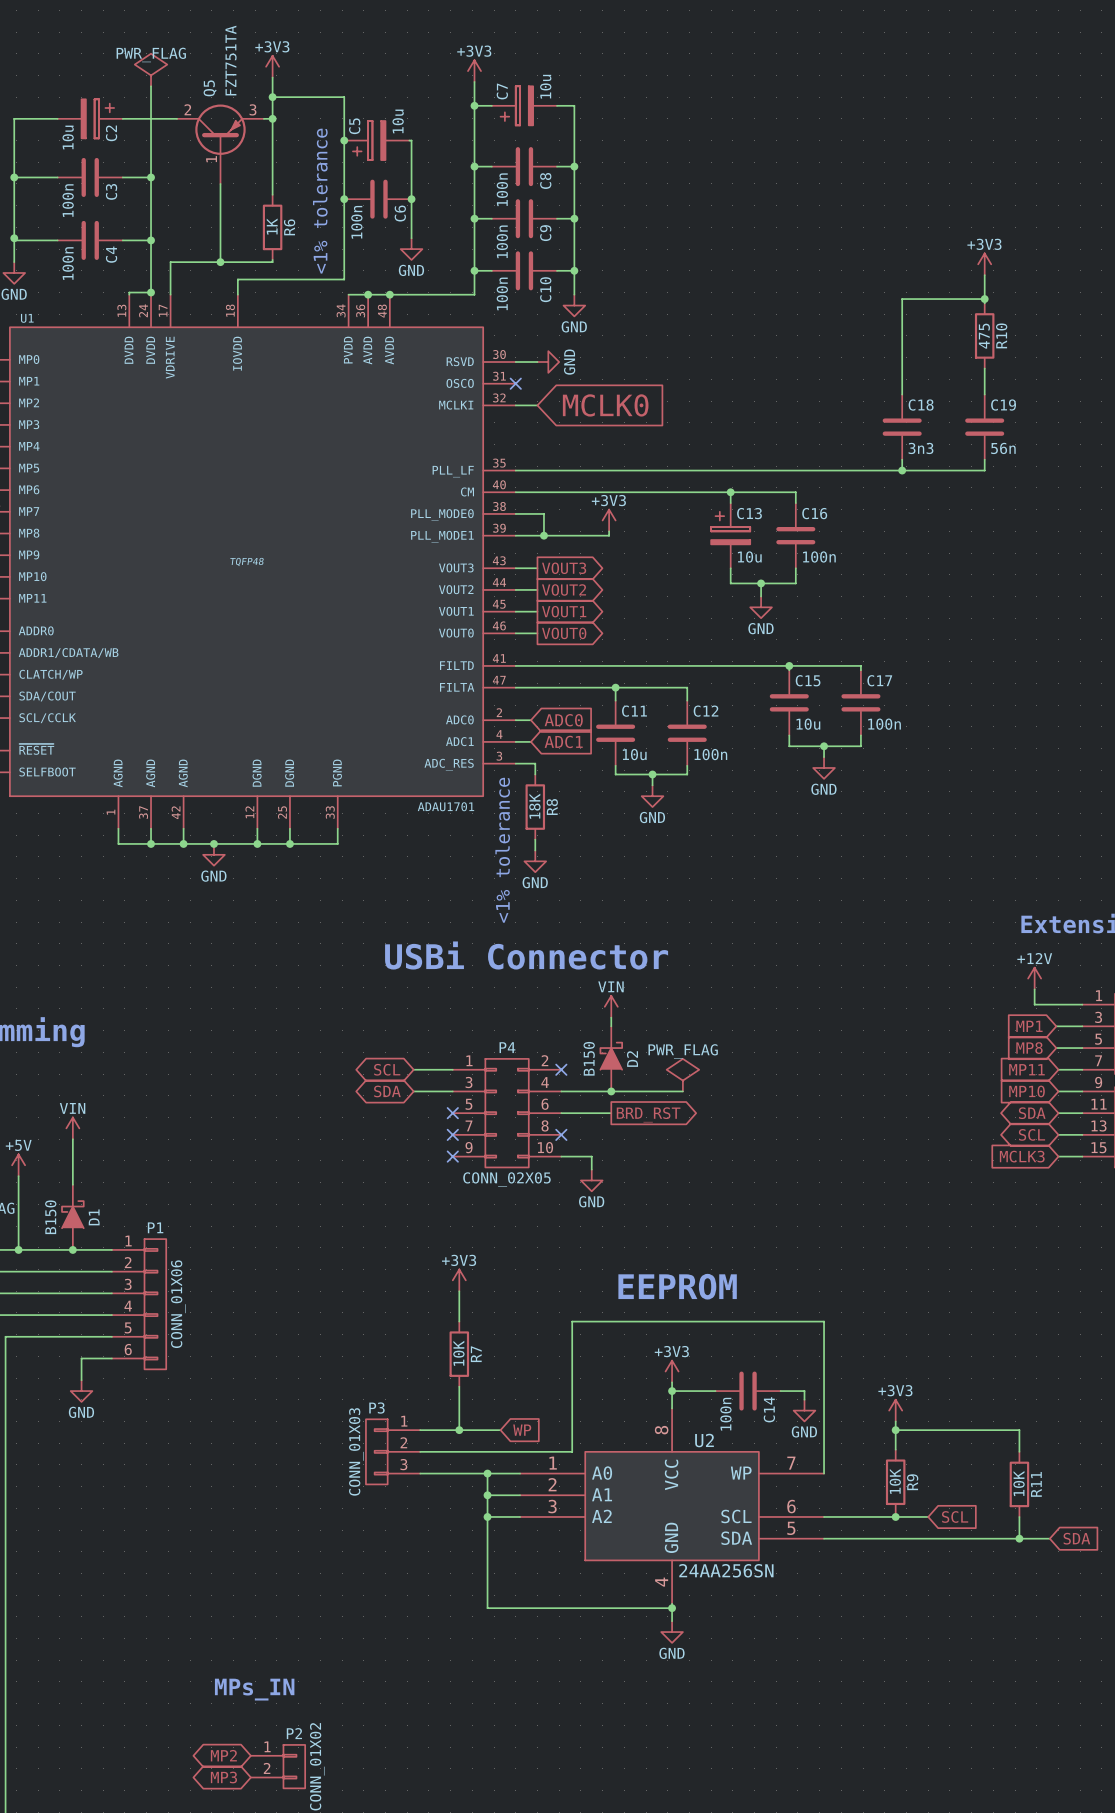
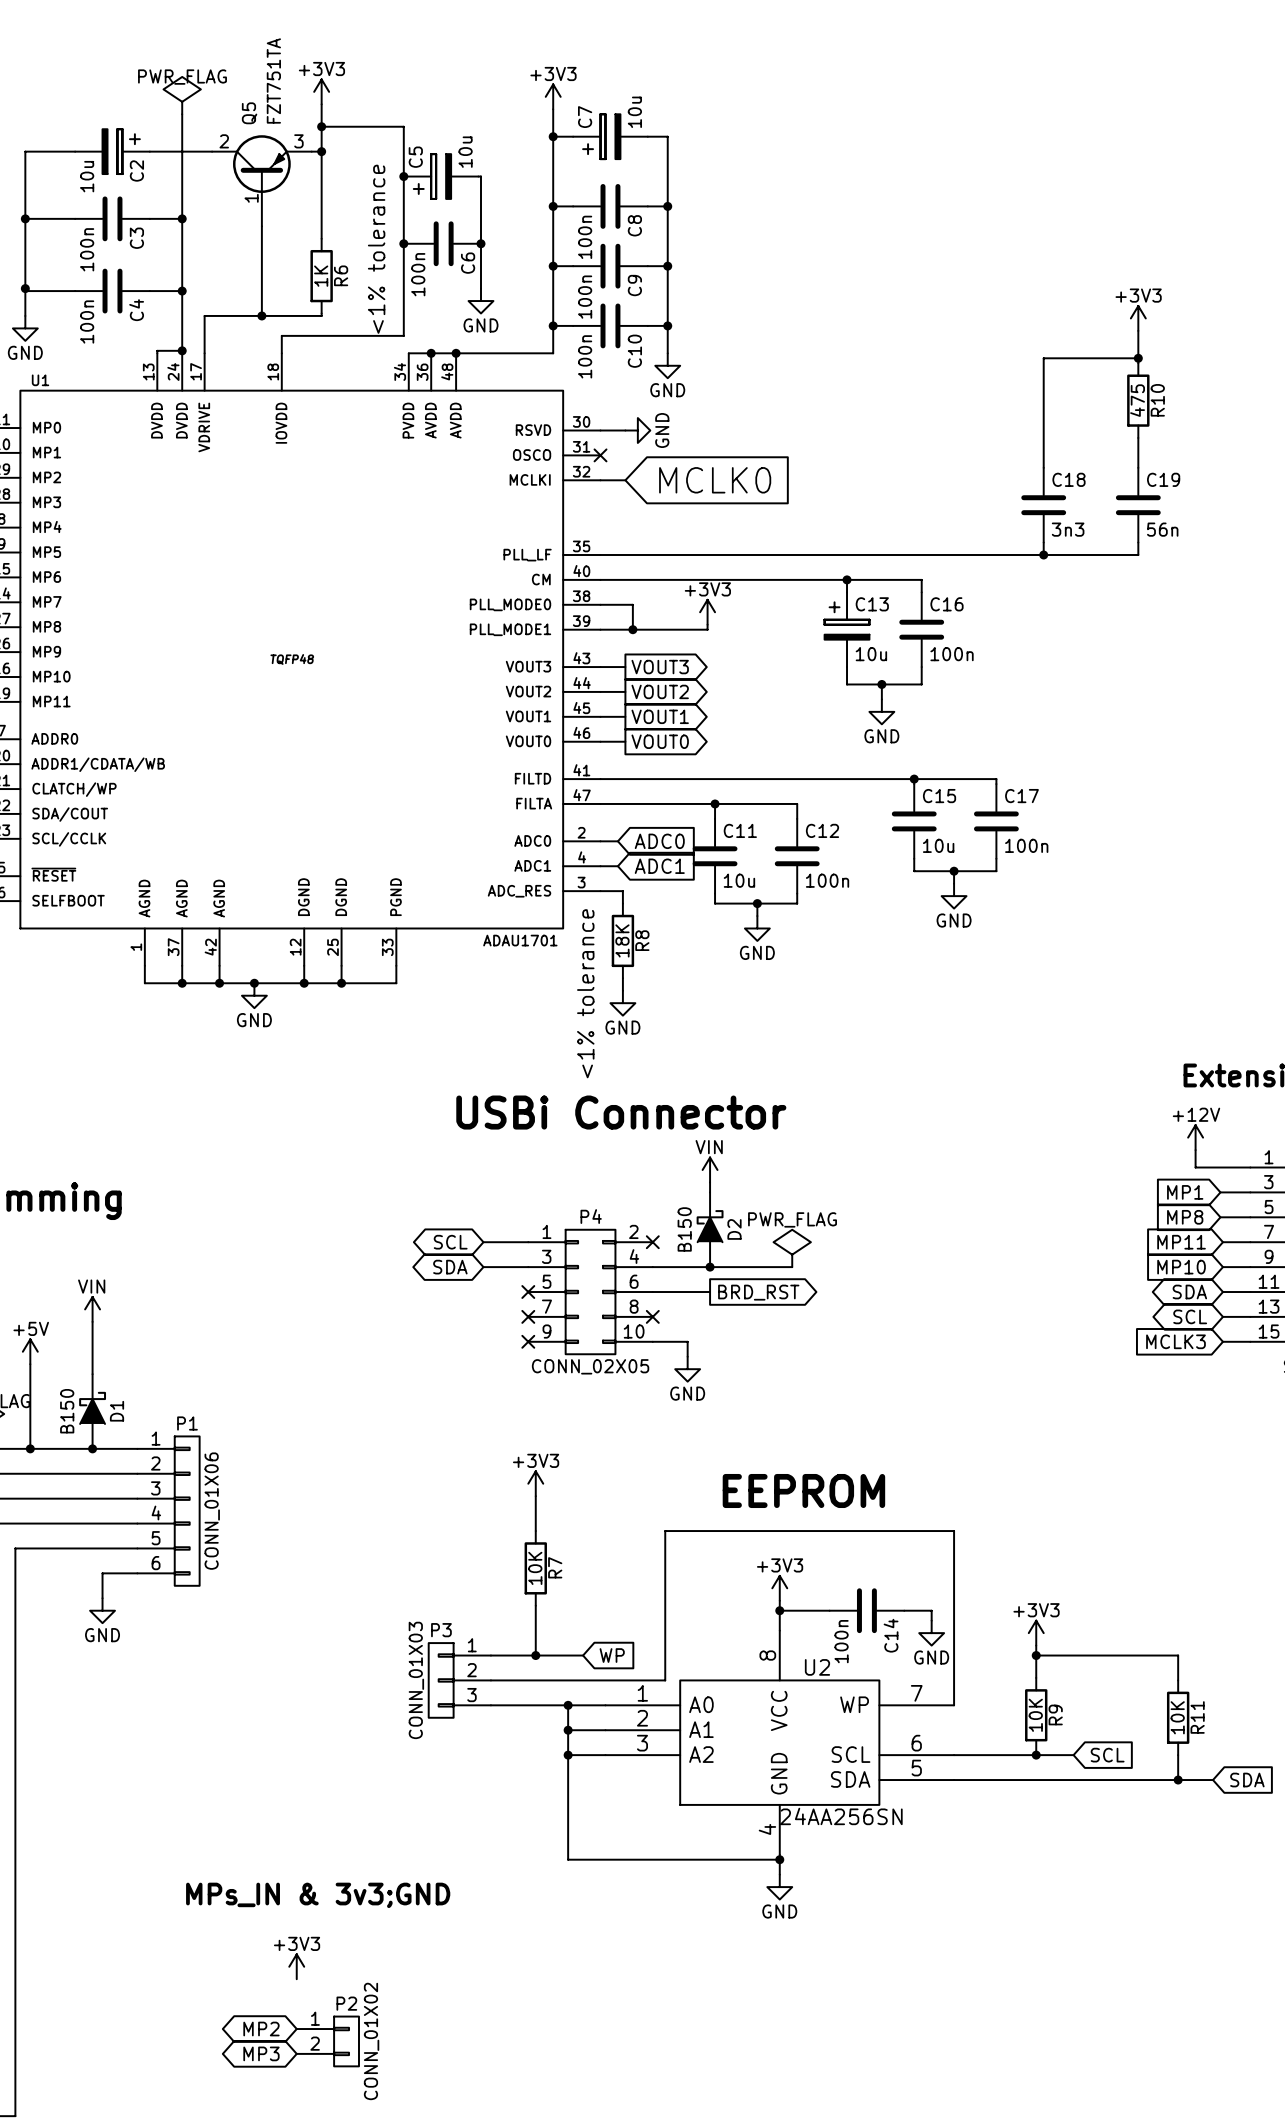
text: none -> MPs_IN & 3v3;GND (318, 1895)
text: MPs_IN (254, 1689) -> none
power symbol: none -> +3V3 (296, 1966)

